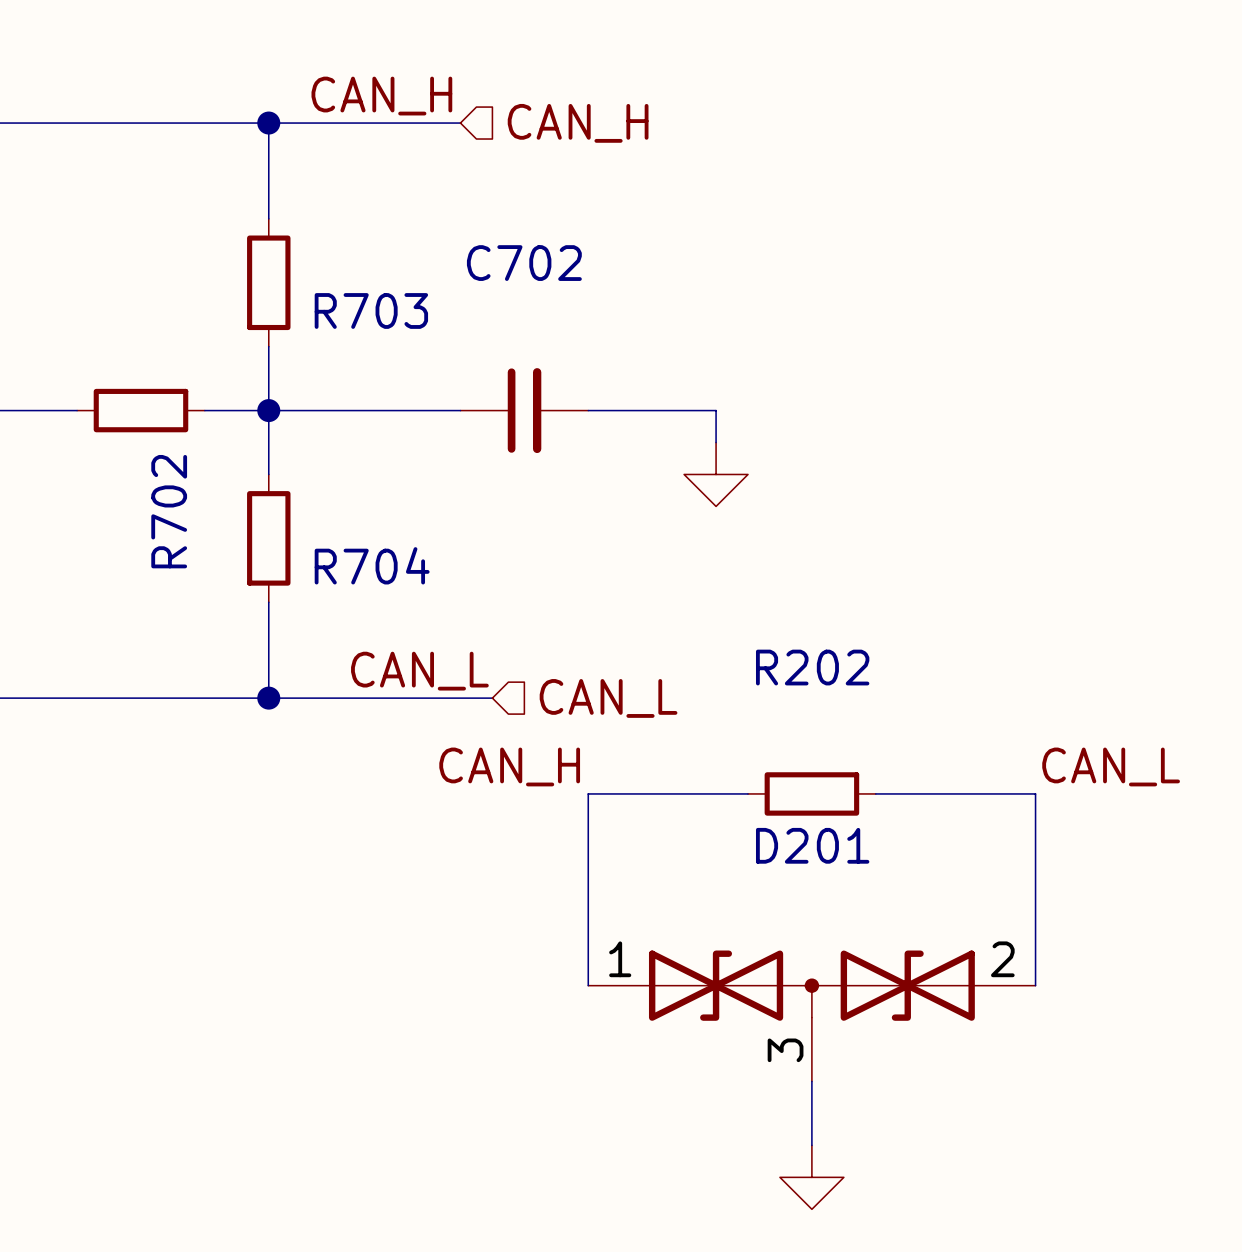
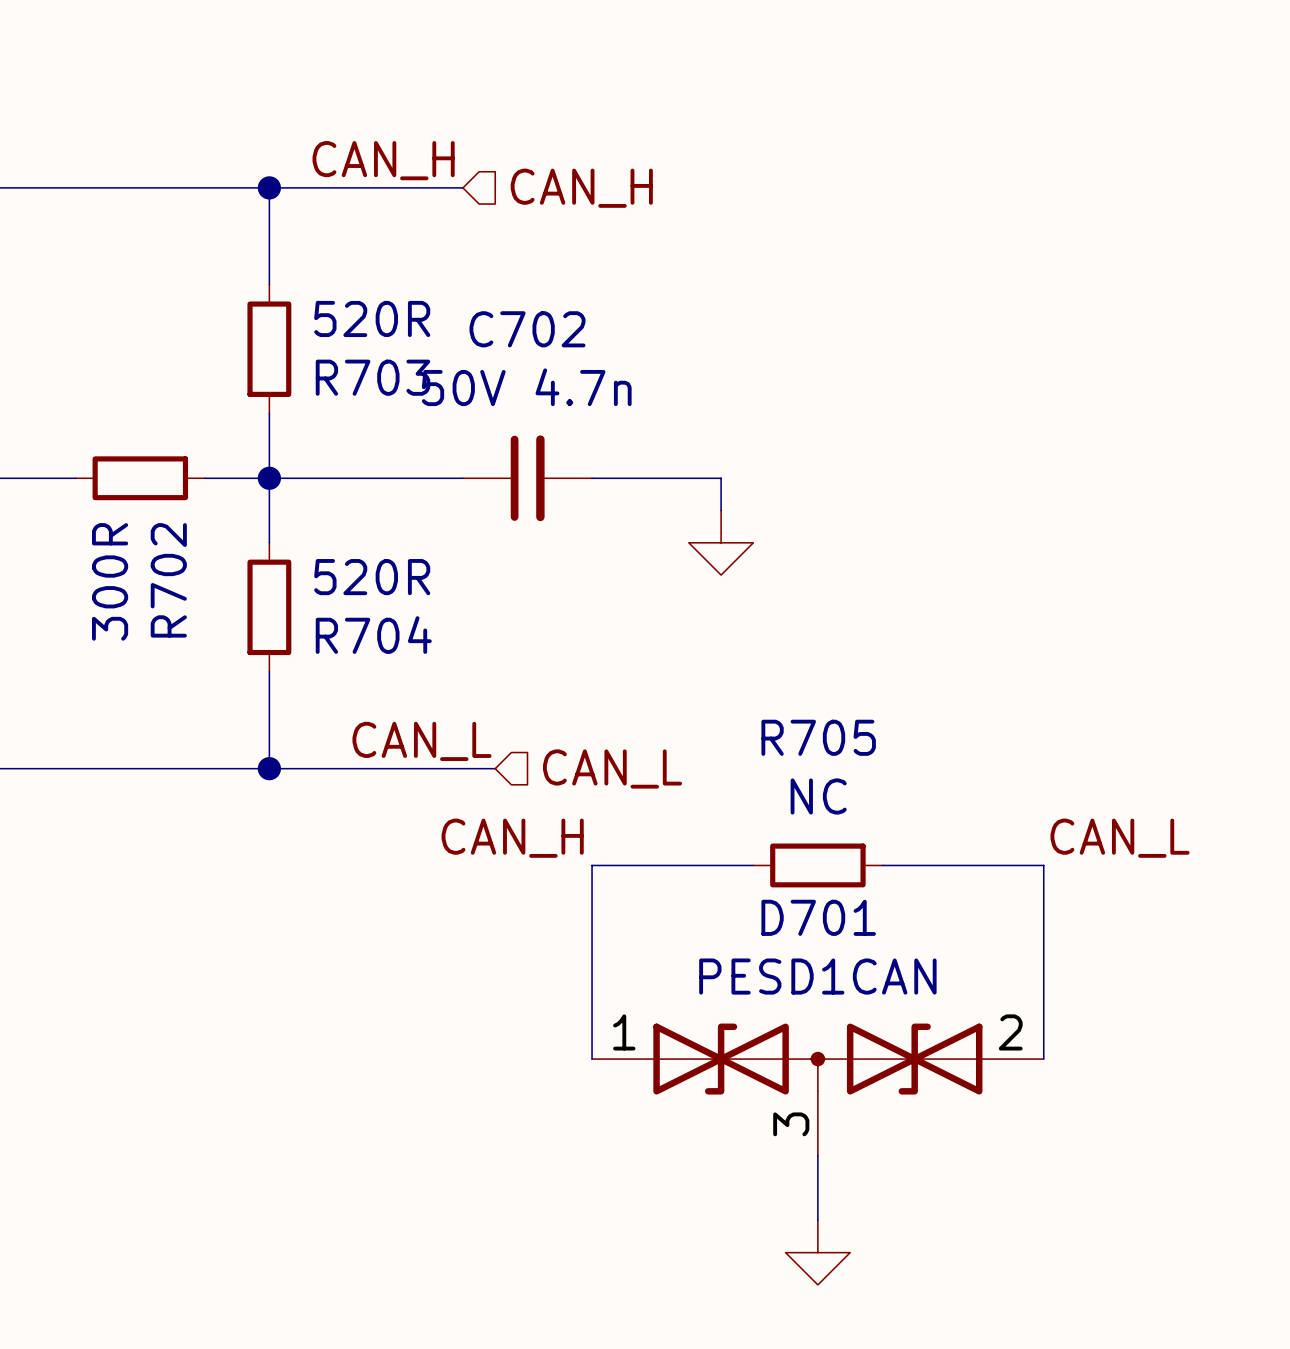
R703 value: none -> 520R (372, 318)
C702 value: none -> 50V 4.7n (526, 387)
R704 value: none -> 520R (372, 577)
R702 value: none -> 300R (110, 581)
R202 name: R202 (812, 667) -> R705 (818, 737)
R202 value: none -> NC (818, 796)
D201 name: D201 (812, 845) -> D701 (818, 917)
D201 value: none -> PESD1CAN (817, 976)

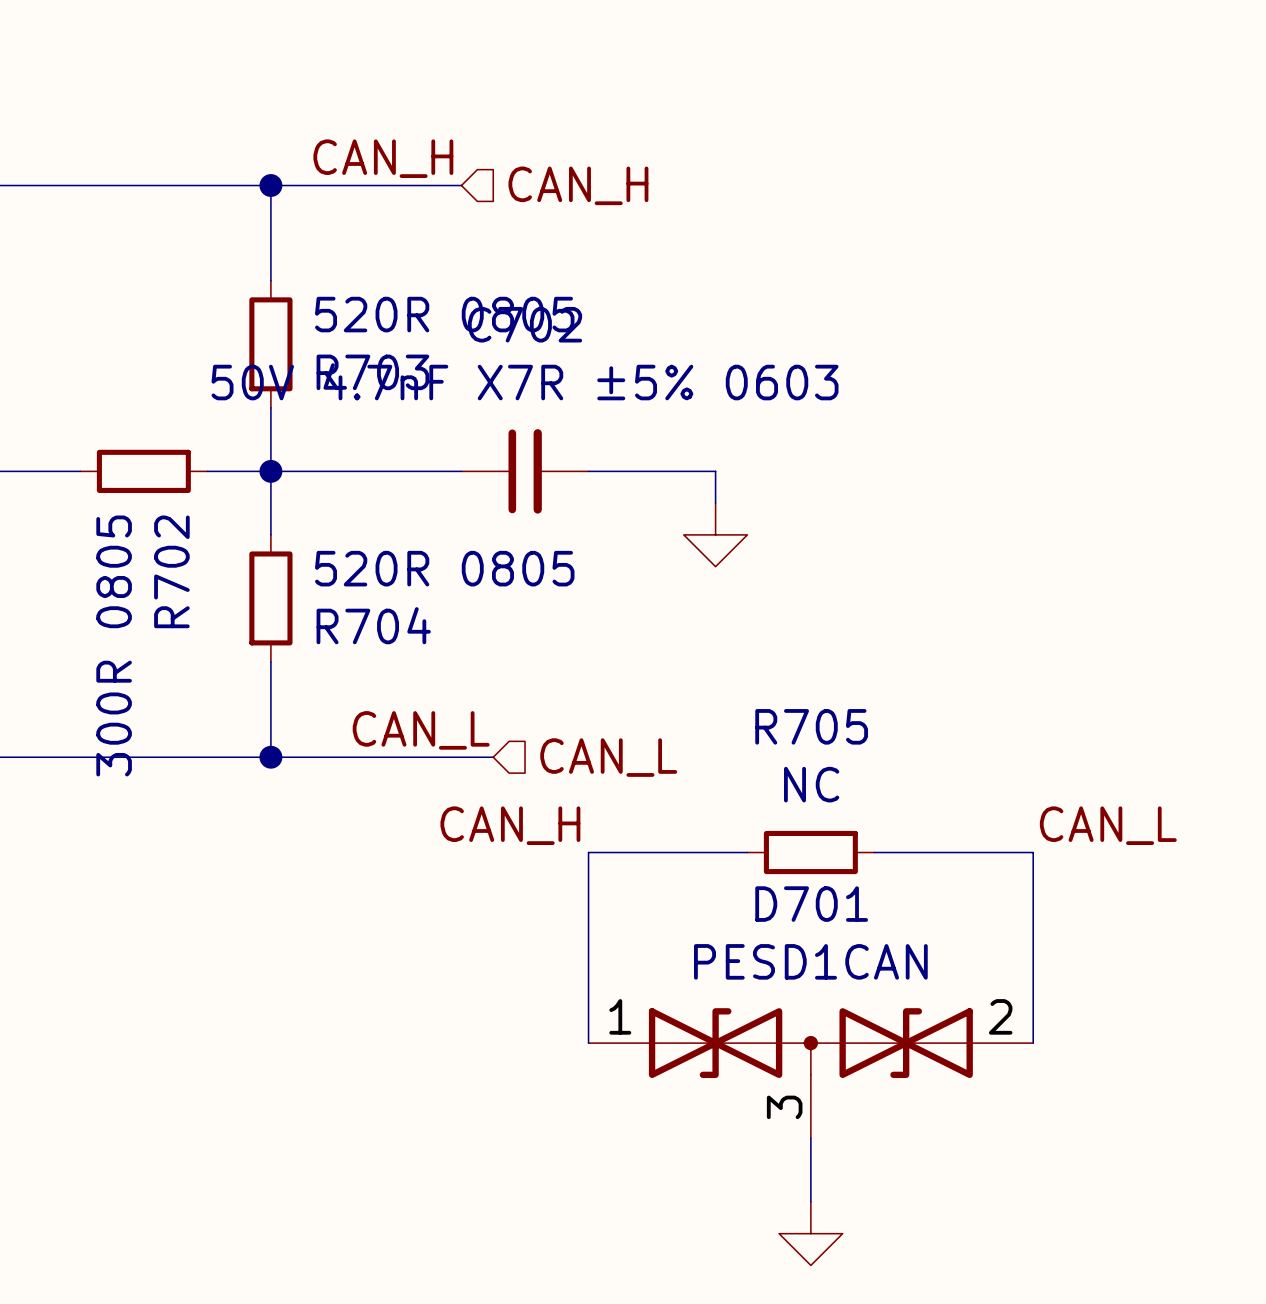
R703 value: 520R (372, 318) -> 520R 0805 (444, 314)
C702 value: 50V 4.7n (526, 387) -> 50V 4.7nF X7R ±5% 0603 (525, 381)
R704 value: 520R (372, 577) -> 520R 0805 (444, 568)
R702 value: 300R (110, 581) -> 300R 0805 (114, 645)

